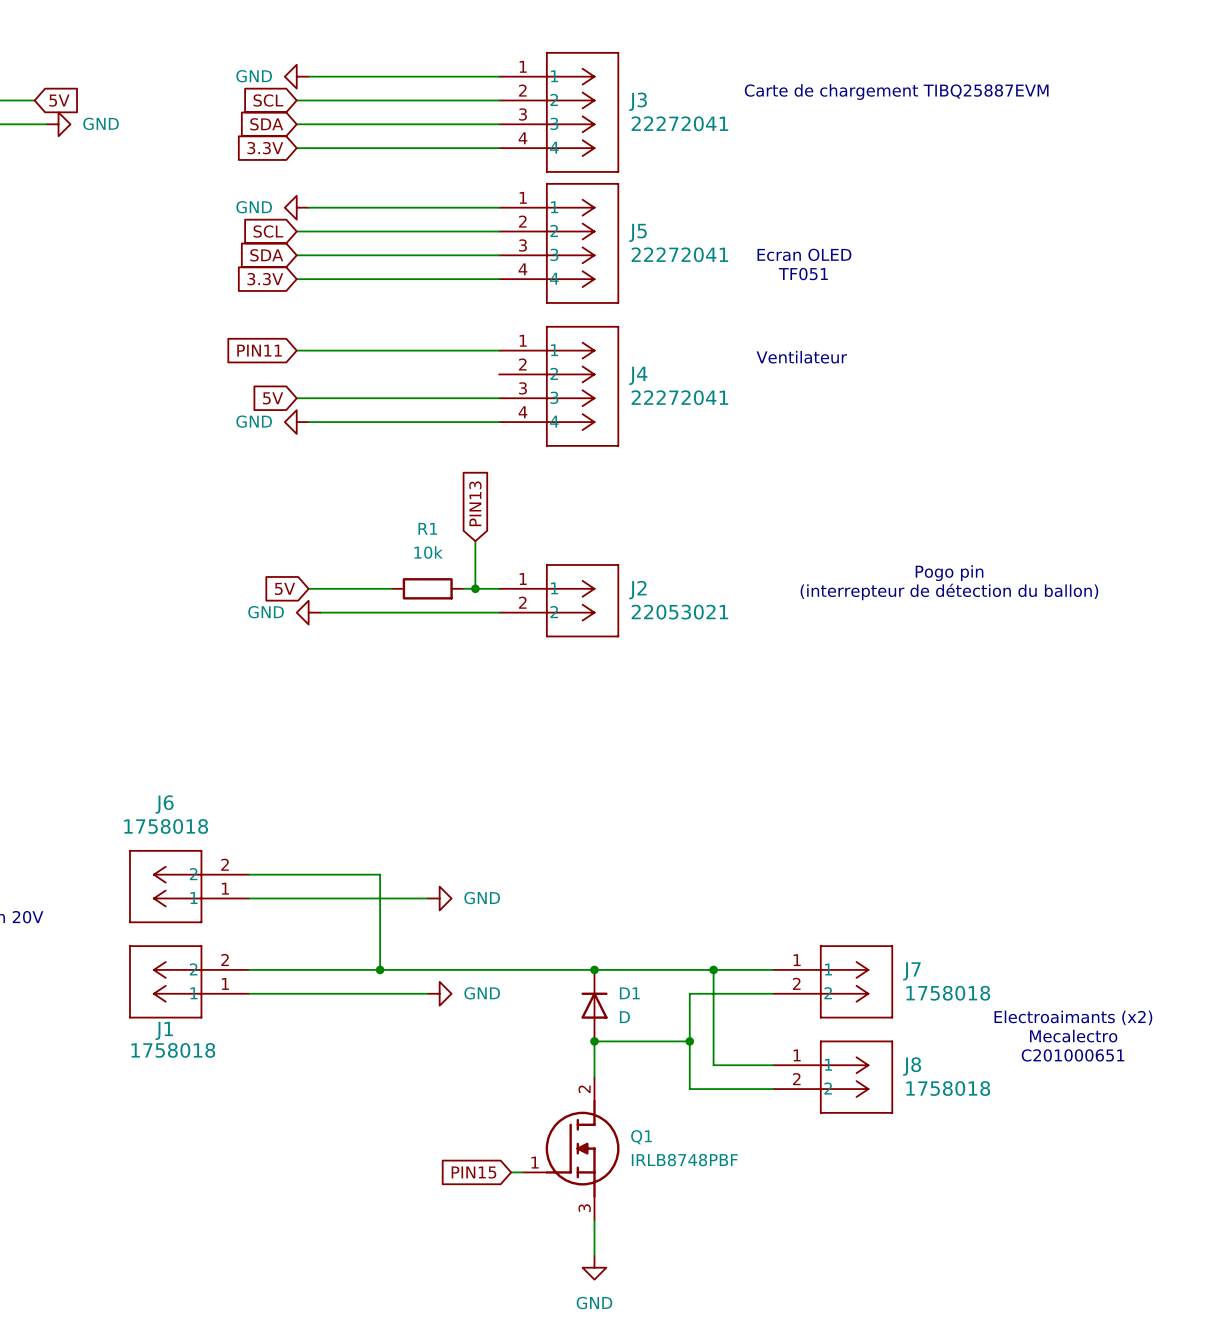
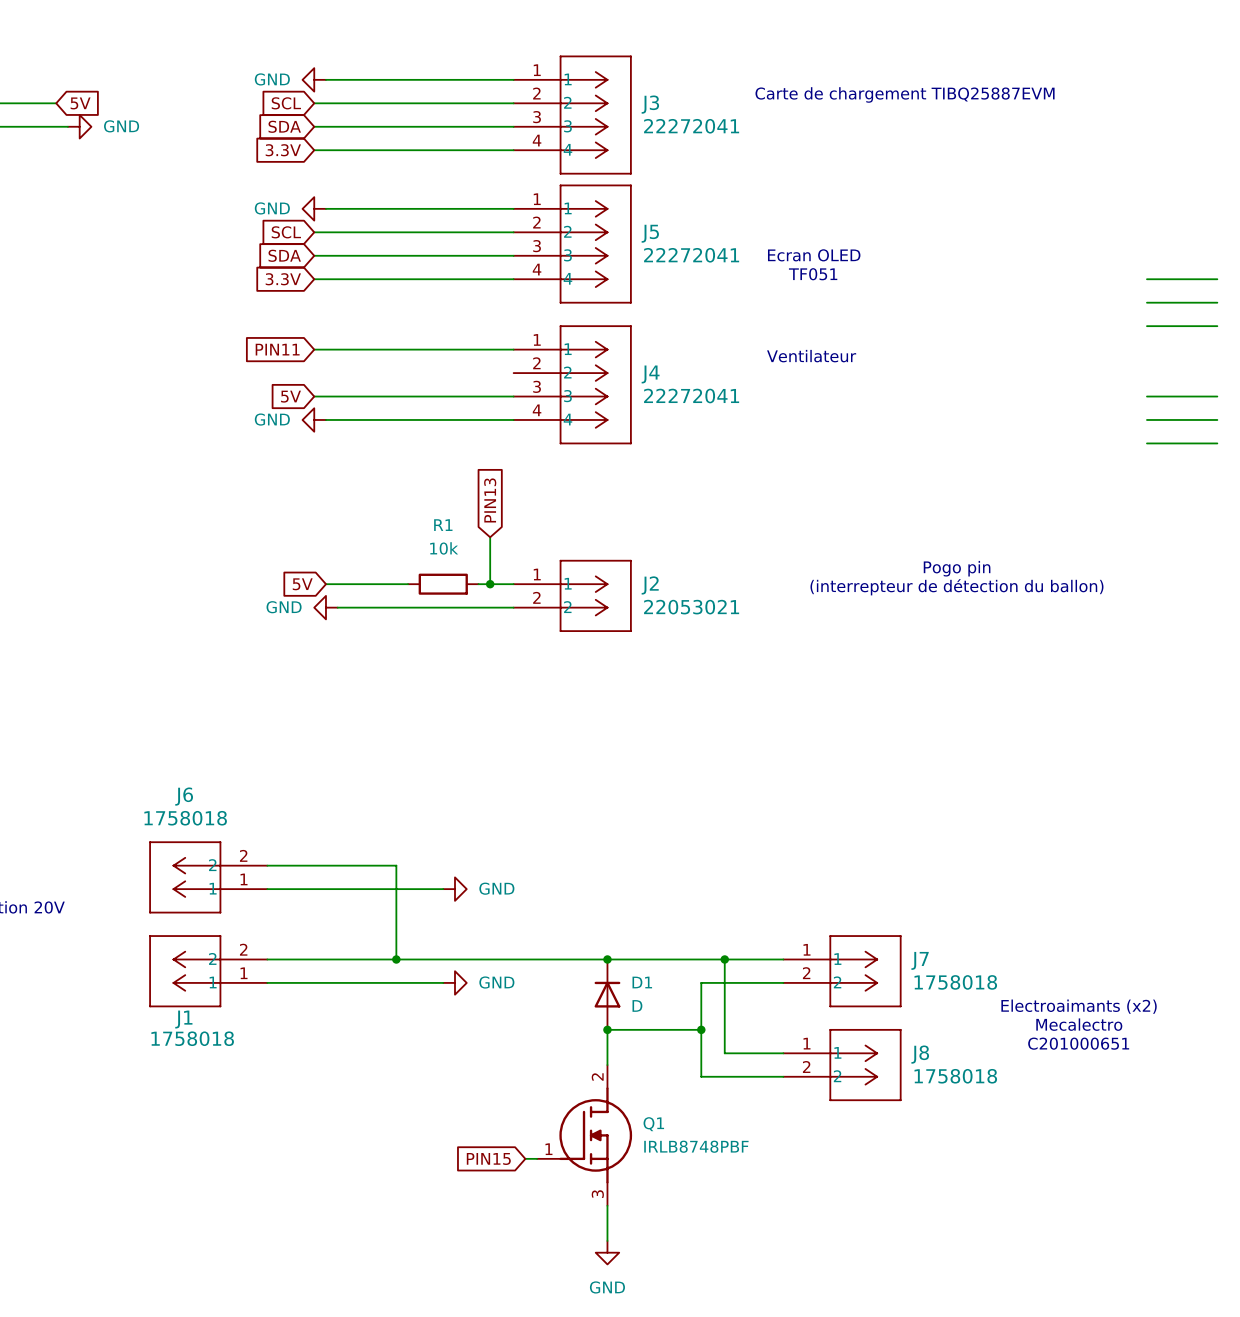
wire: none -> (1146, 279) (1217, 279)
wire: none -> (1146, 302) (1217, 302)
wire: none -> (1146, 326) (1217, 326)
wire: none -> (1146, 396) (1217, 396)
wire: none -> (1146, 419) (1217, 419)
wire: none -> (1146, 443) (1217, 443)

